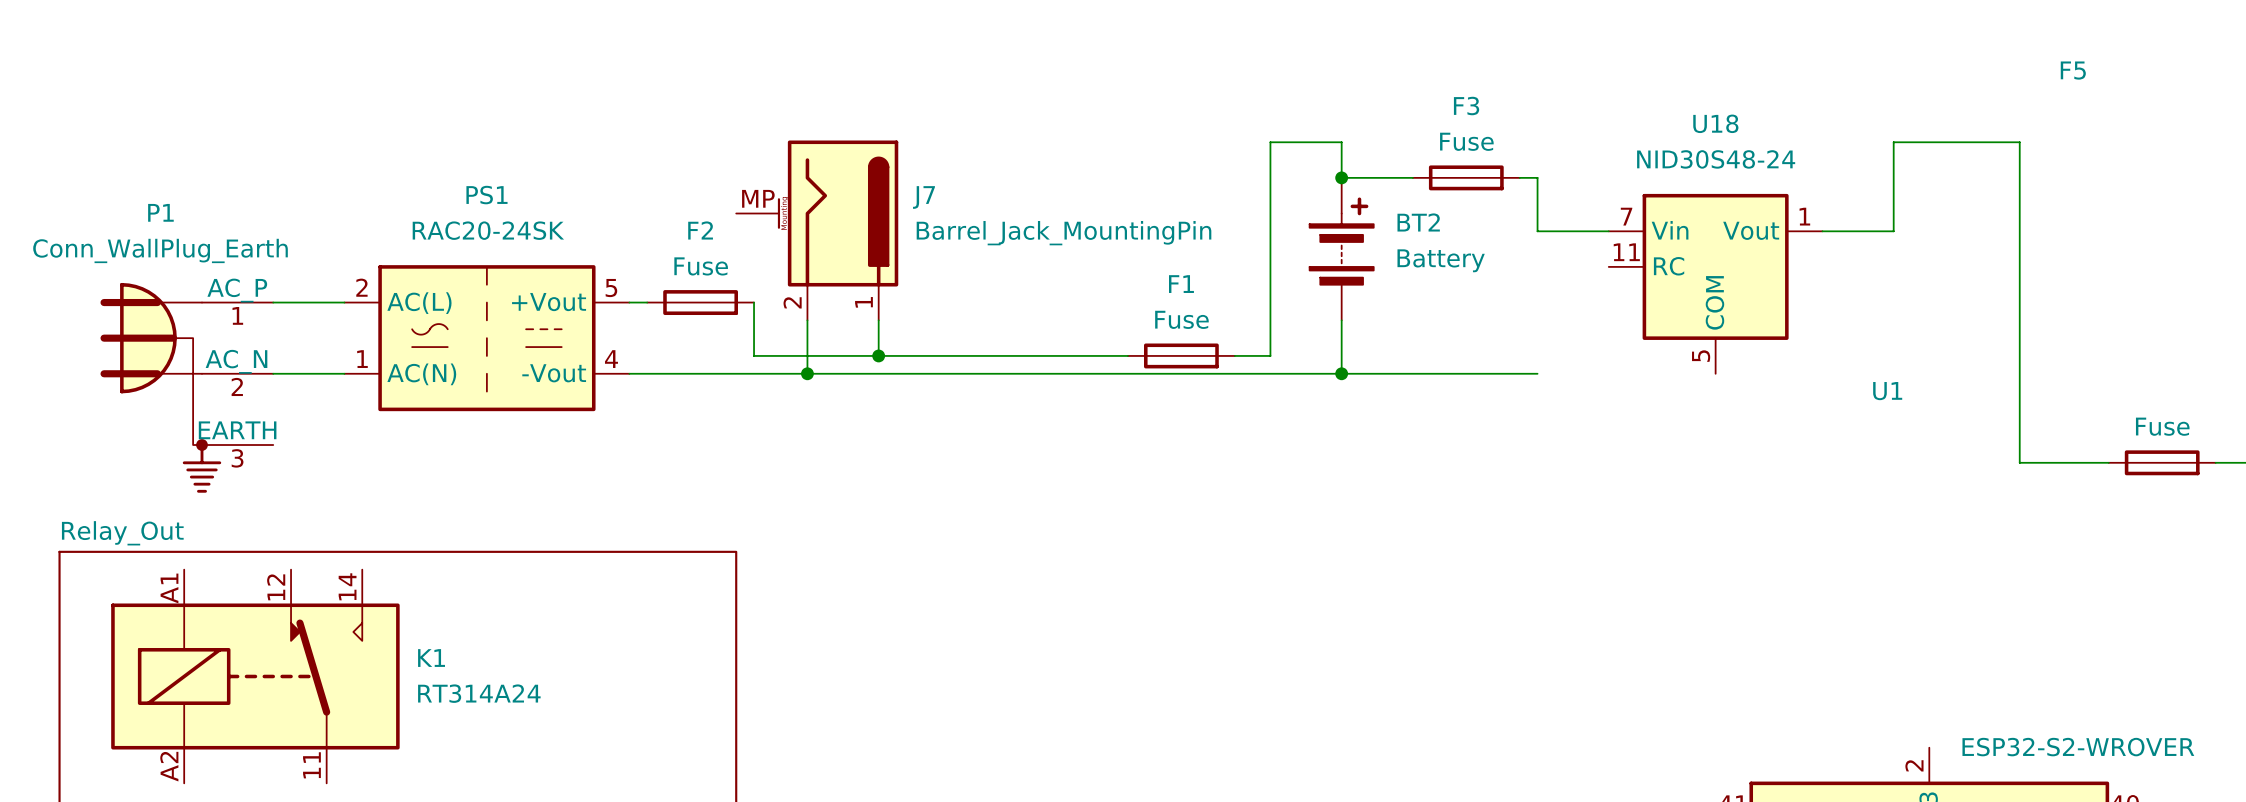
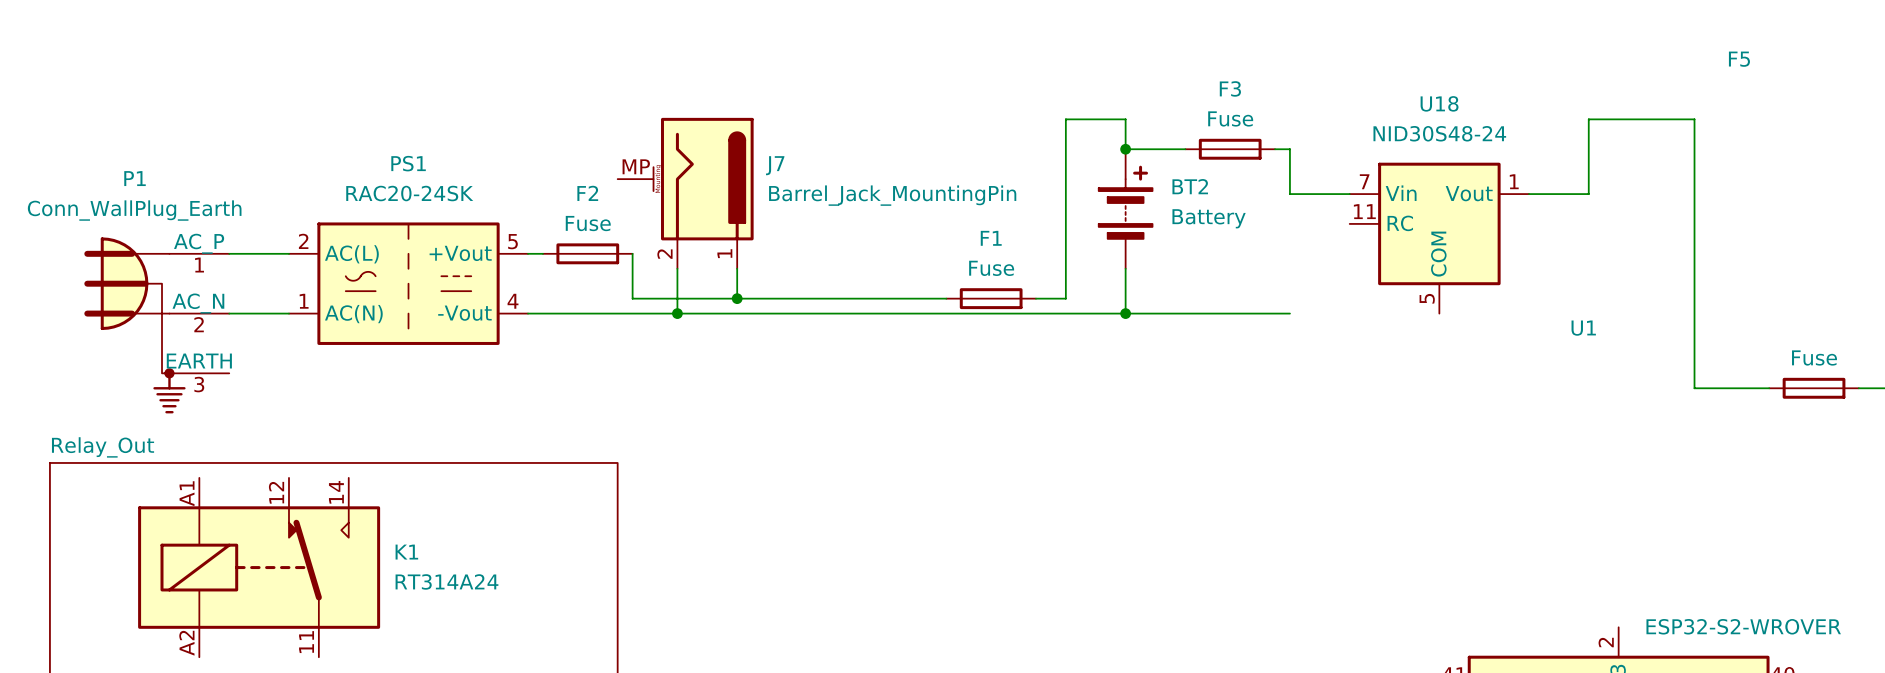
K1 position: (255, 676) -> (259, 567)

